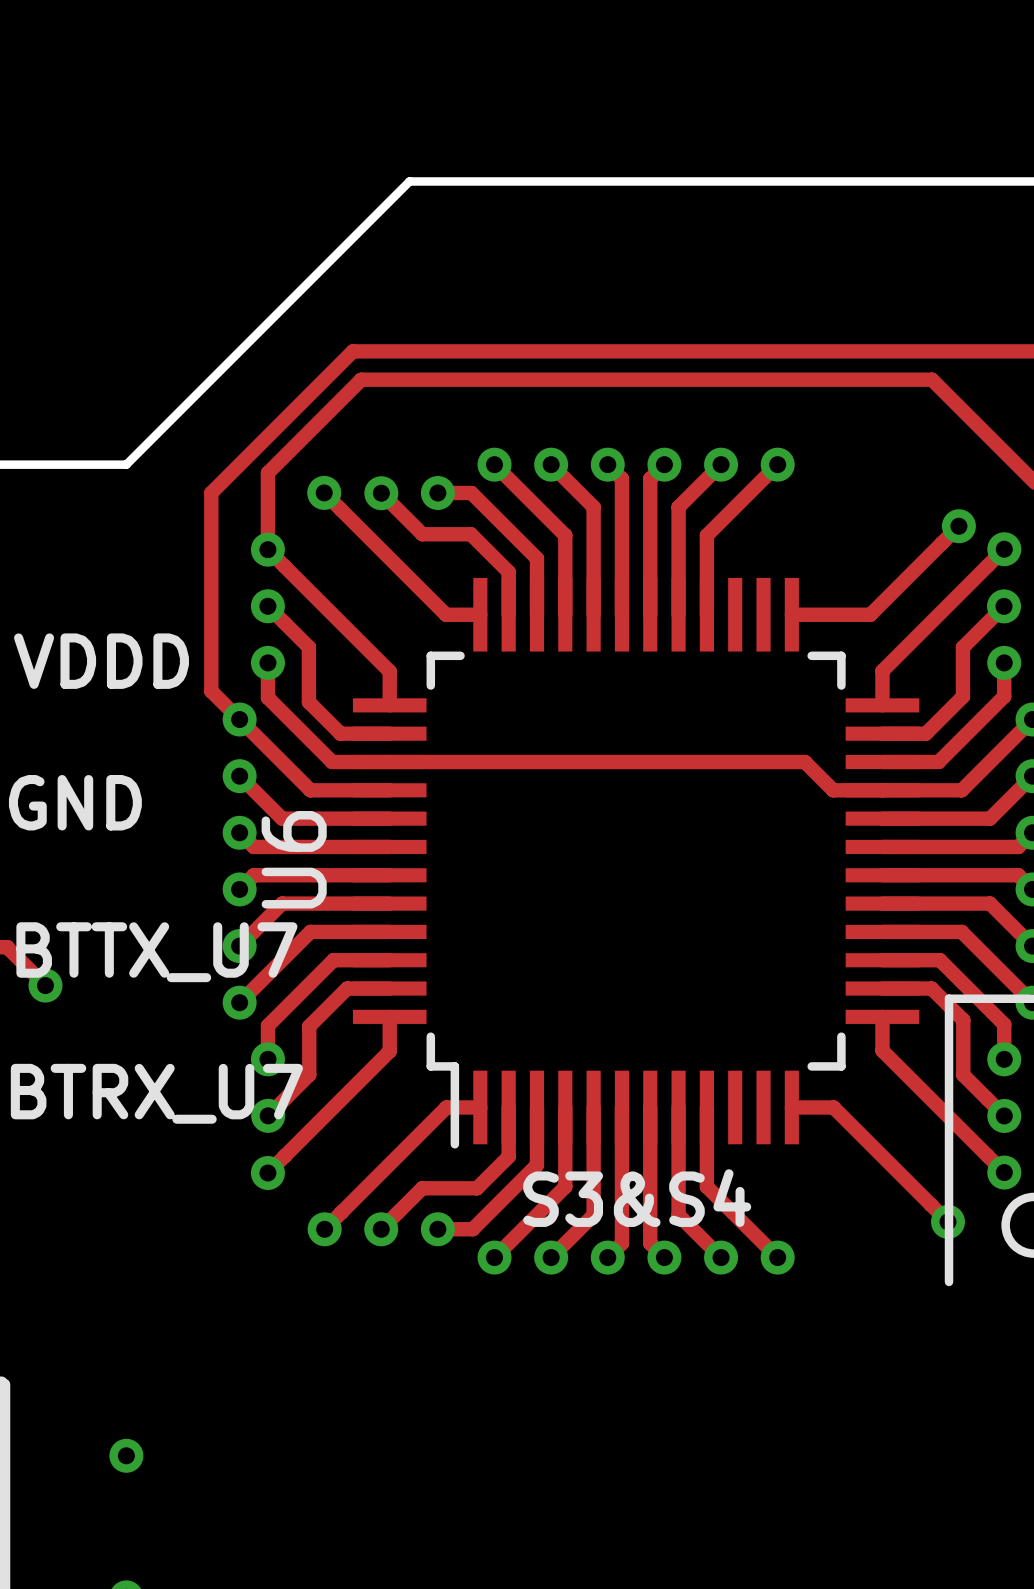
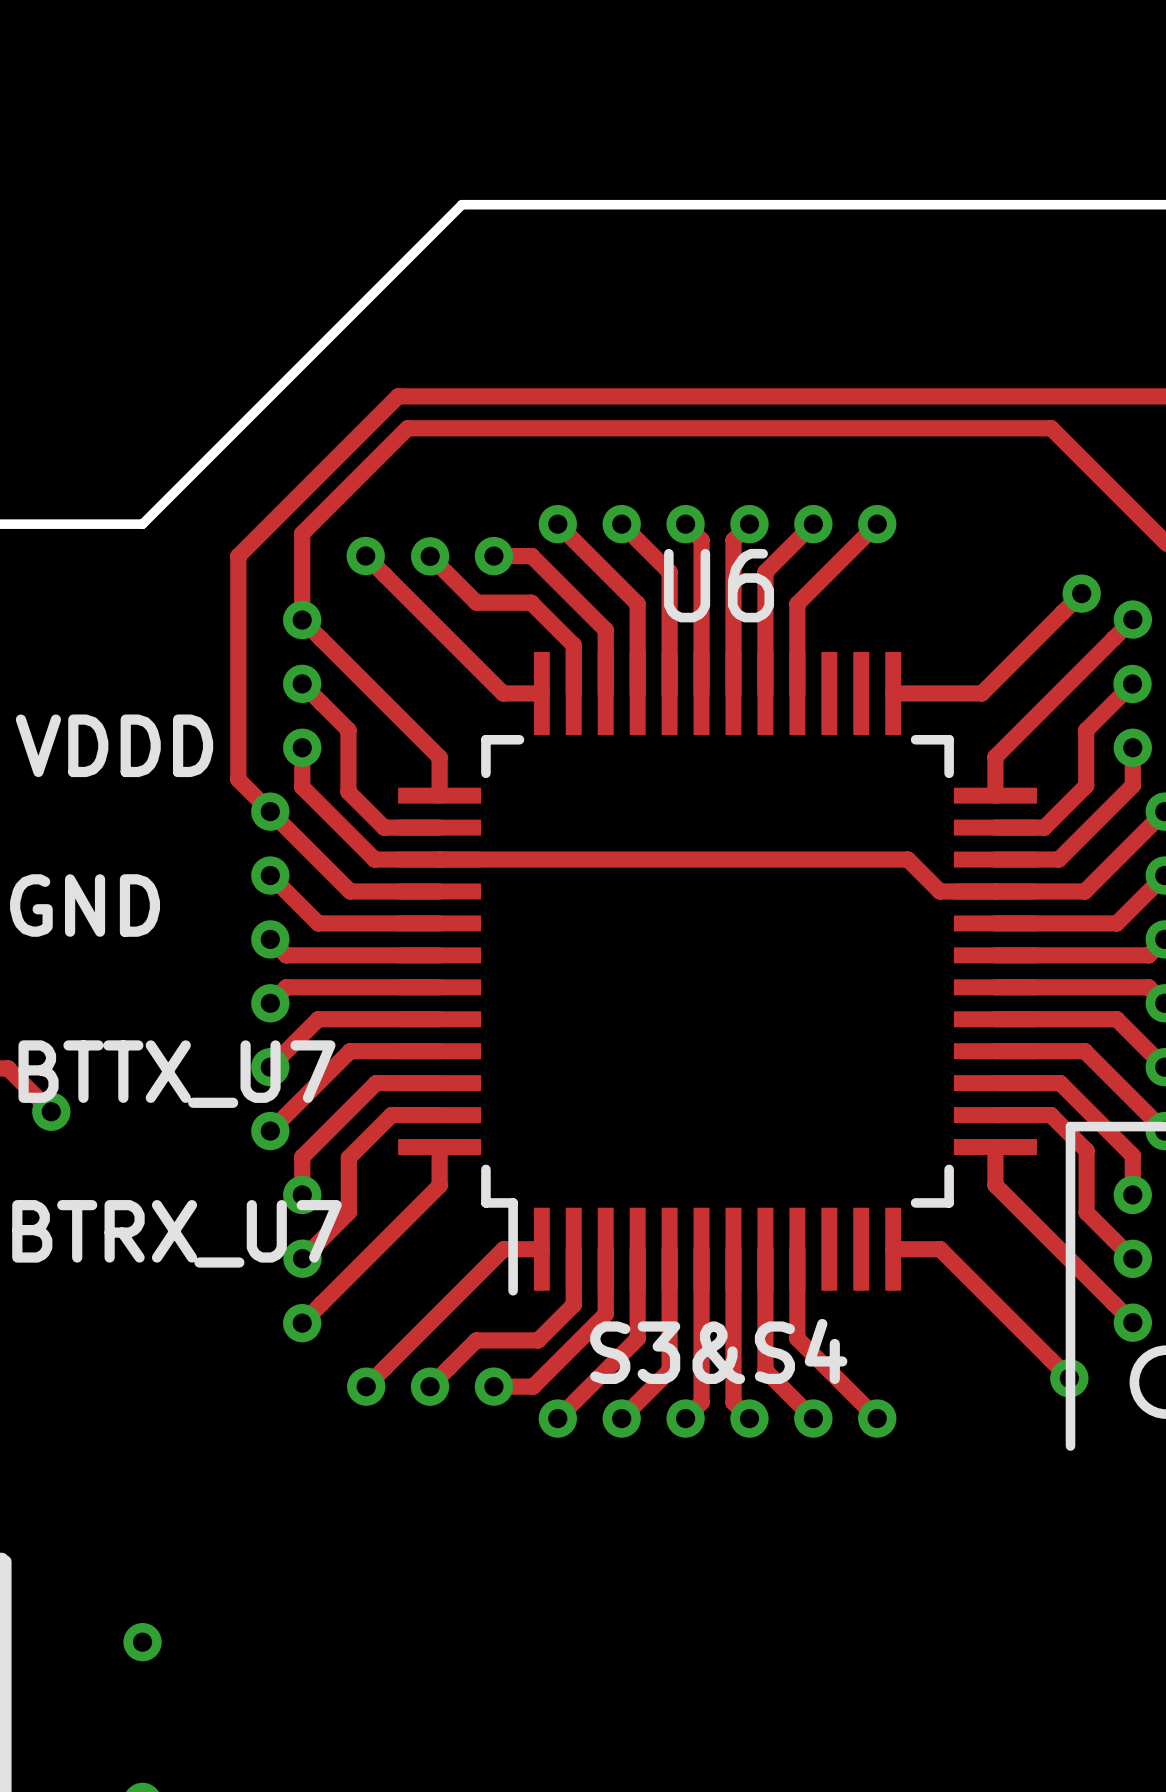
U6 name rotation: 0° (294, 859) -> 90° clockwise (719, 585)
U6 name position: U6 (294, 859) -> U6 (719, 585)

